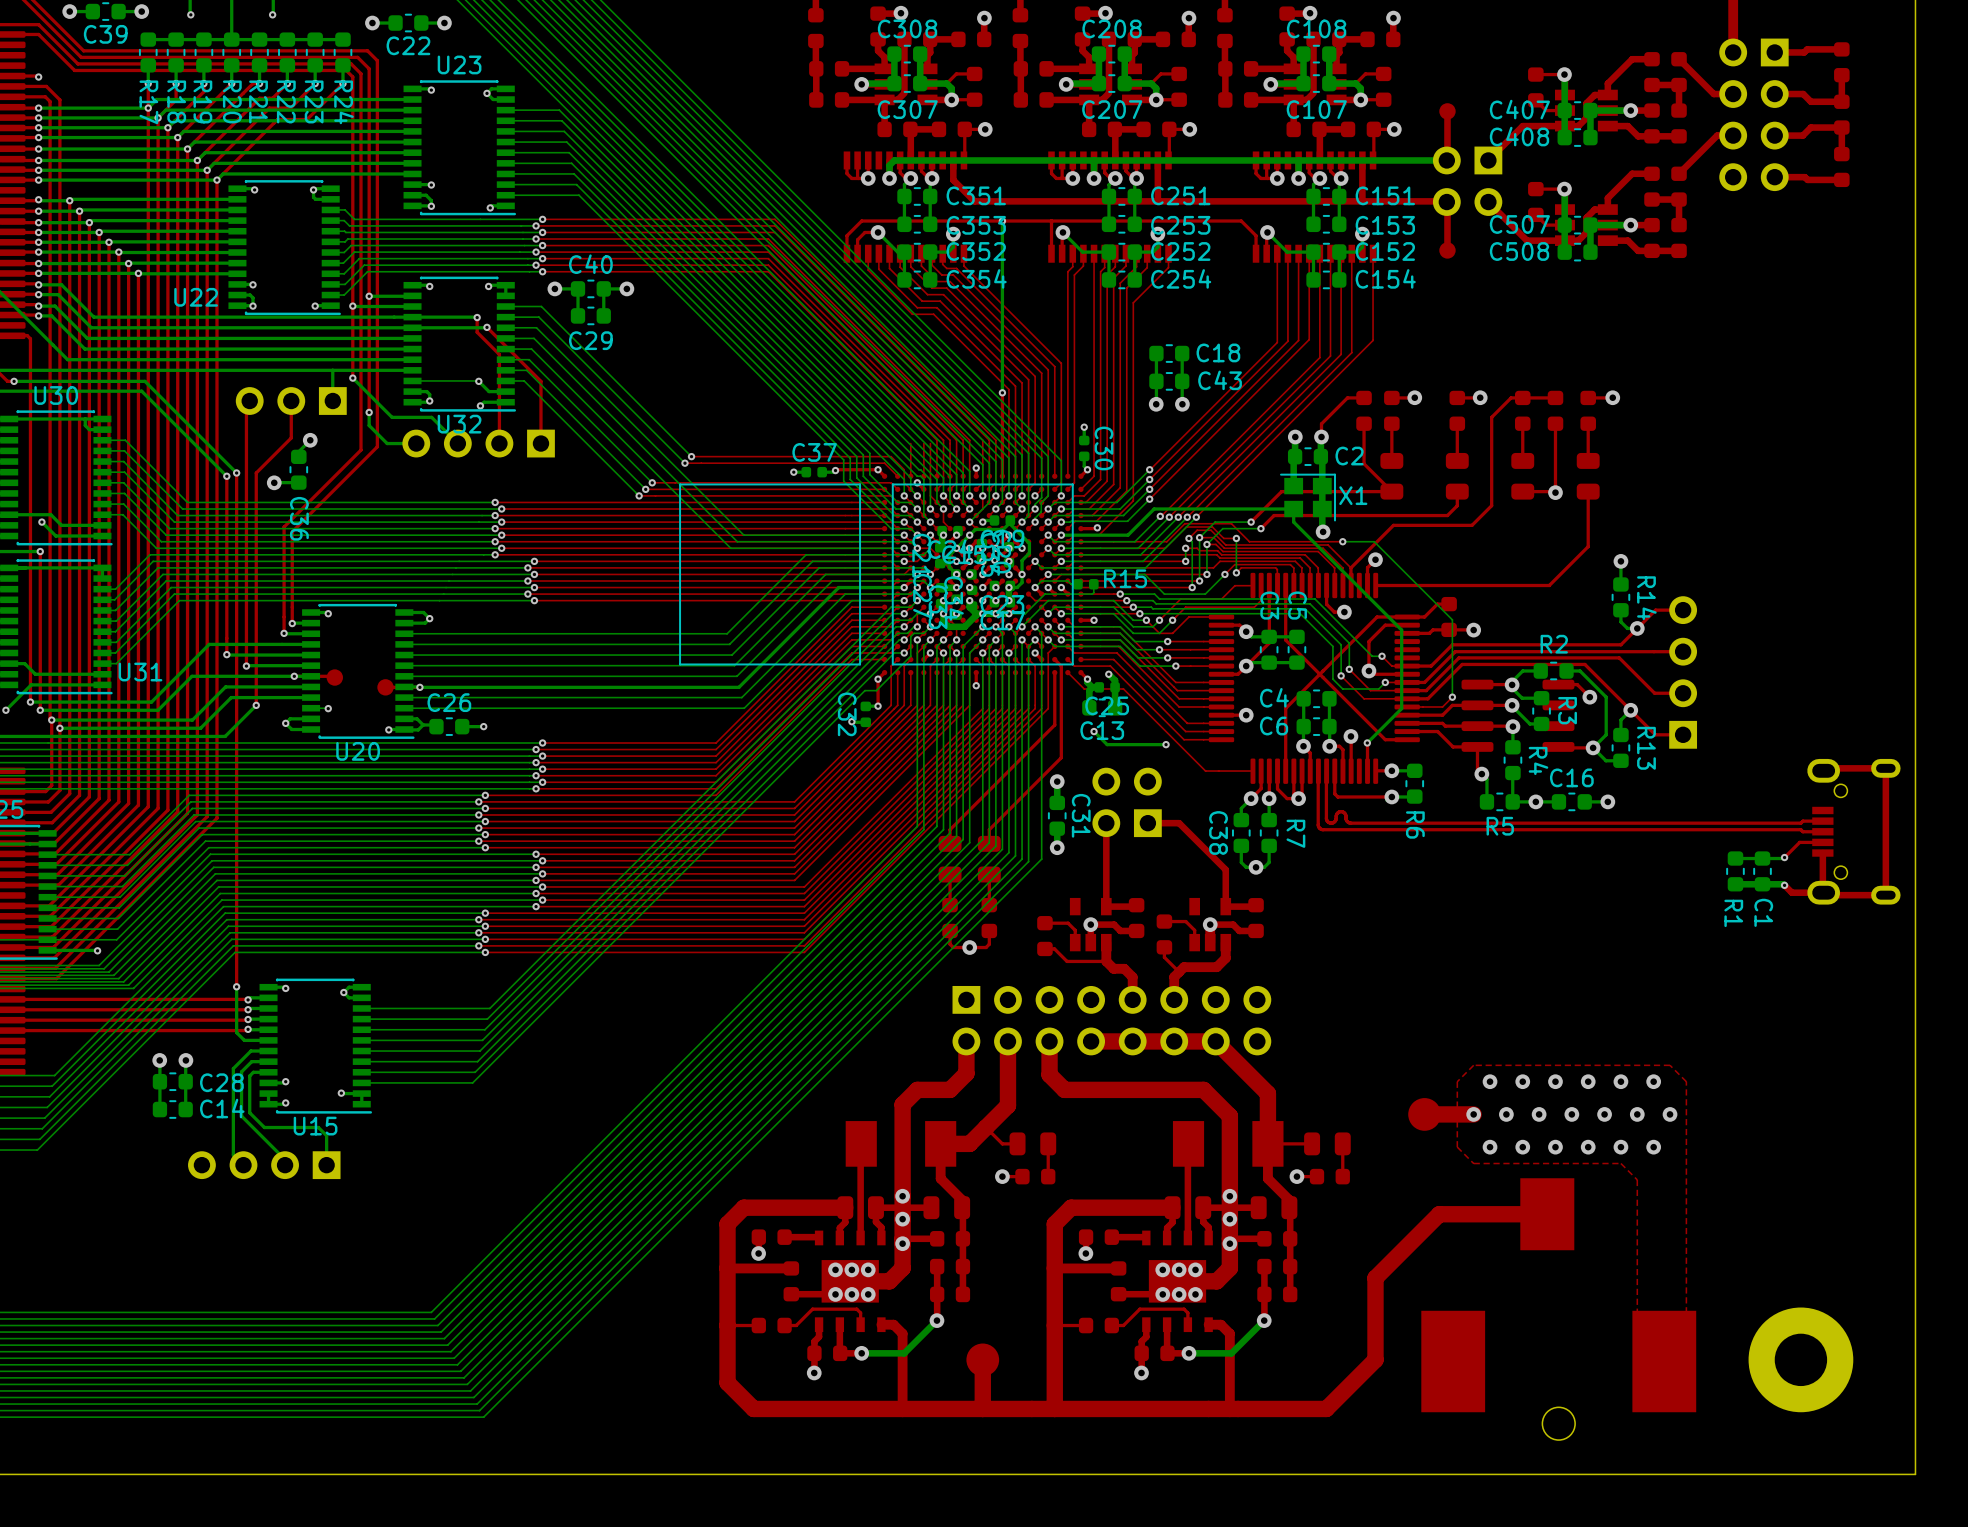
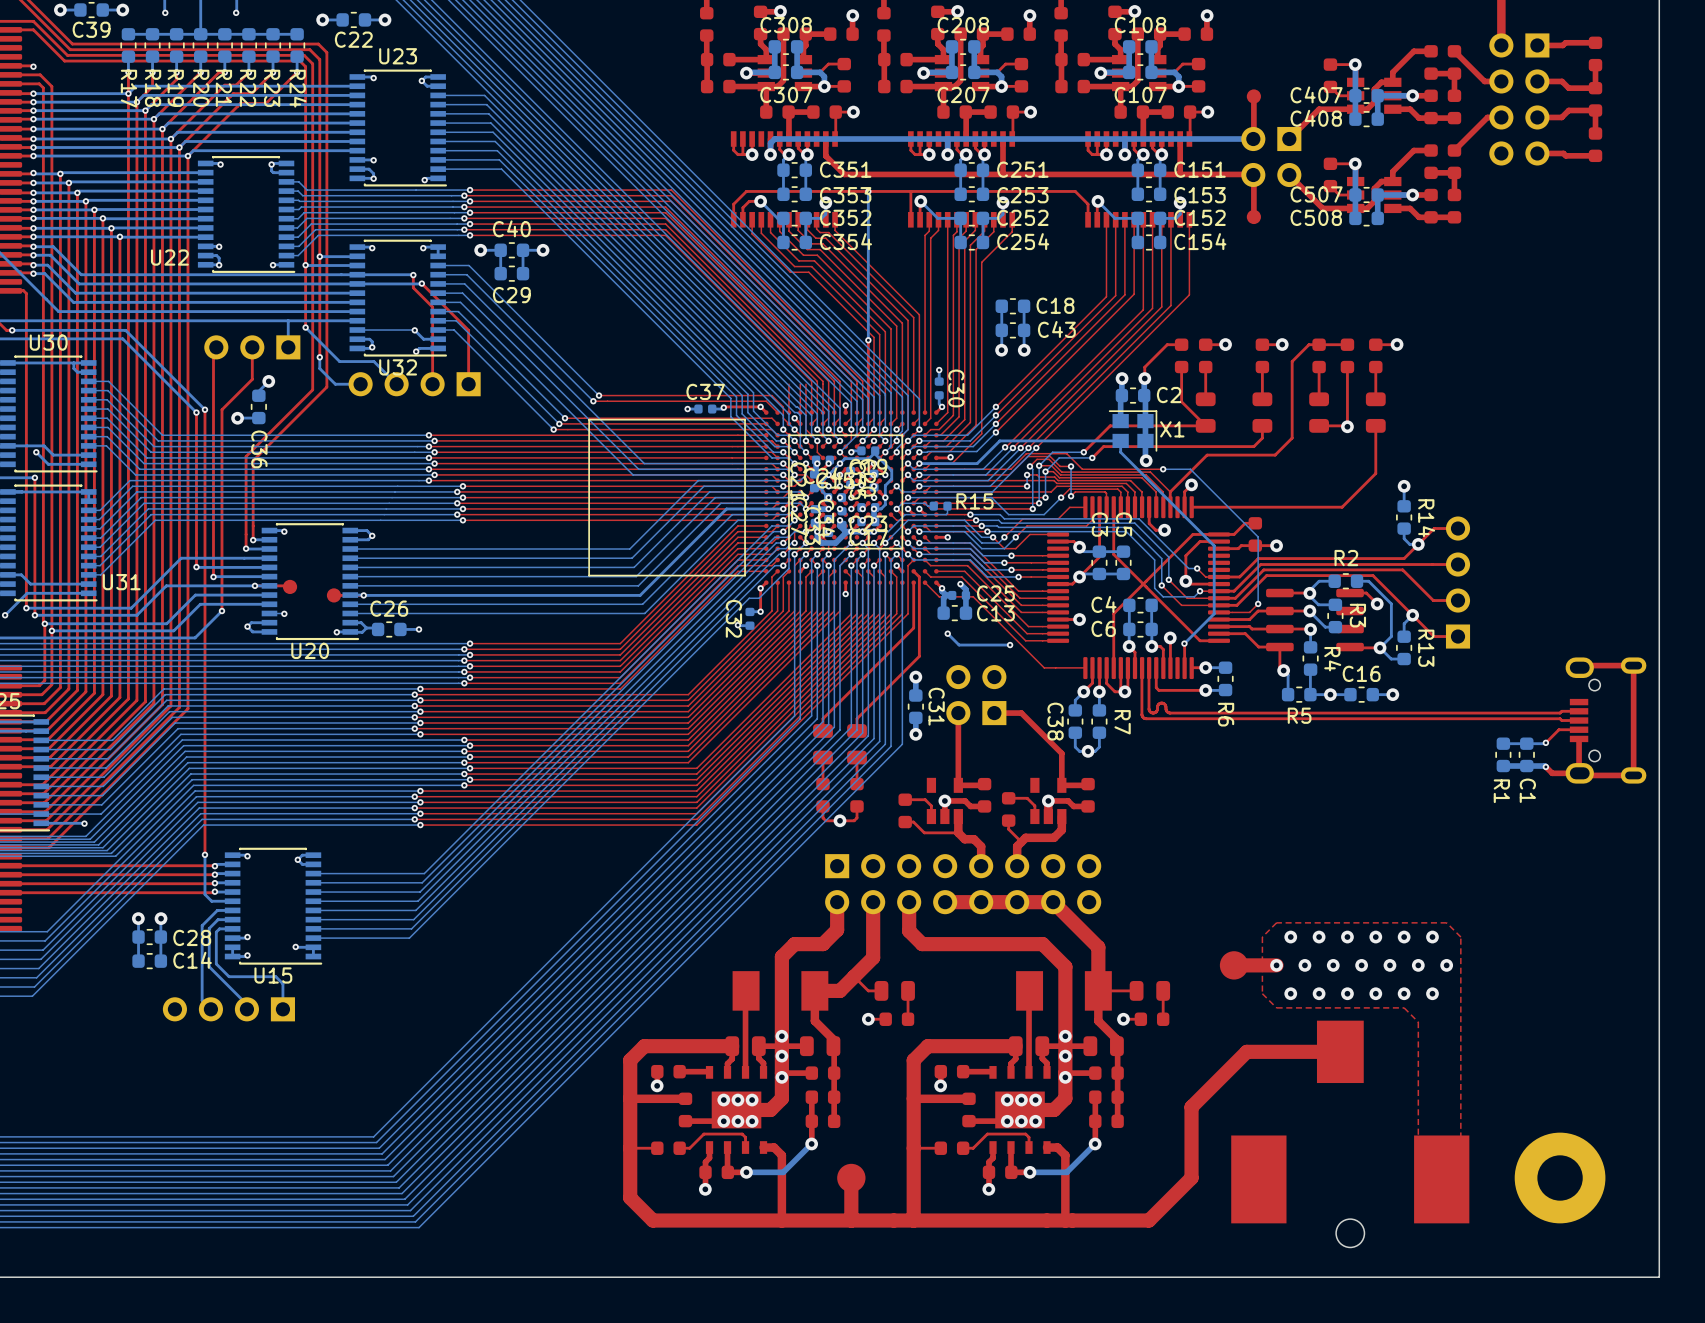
line: (1072, 484) (1072, 664) (892, 664) (892, 484) (1072, 484) -> (902, 435) (902, 548) (788, 548) (788, 435) (902, 435)
C25 name position: C25 (1107, 705) -> C25 (995, 593)
C13 name position: C13 (1102, 730) -> C13 (995, 613)

